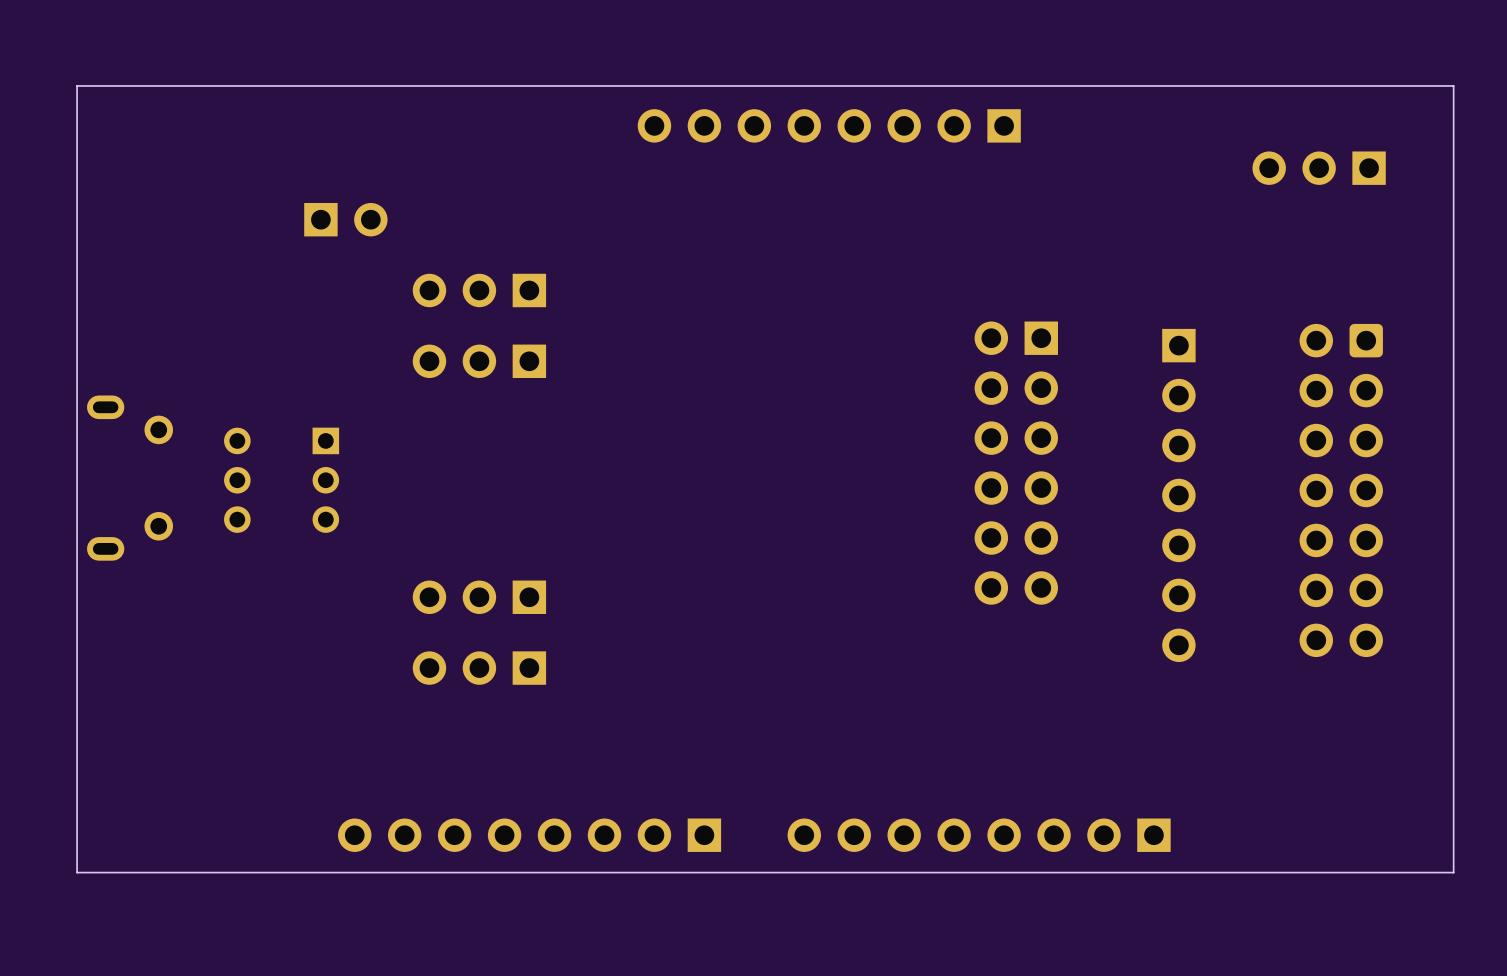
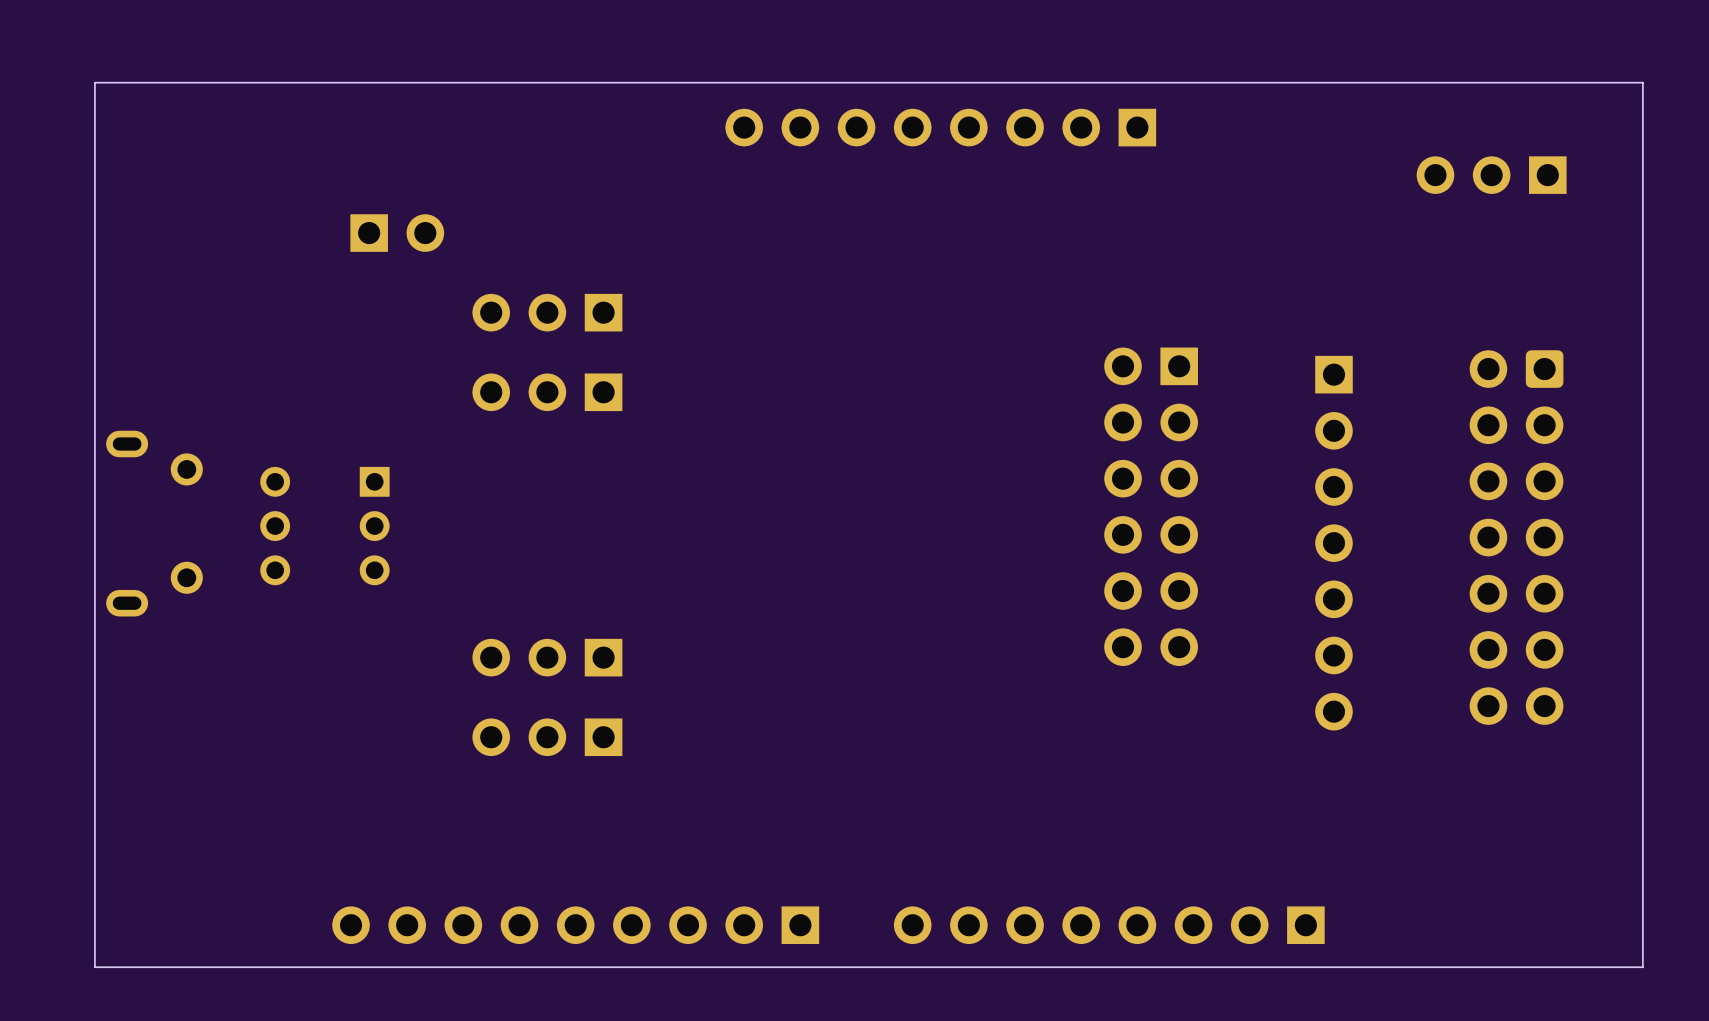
part: none -> (575, 925)

